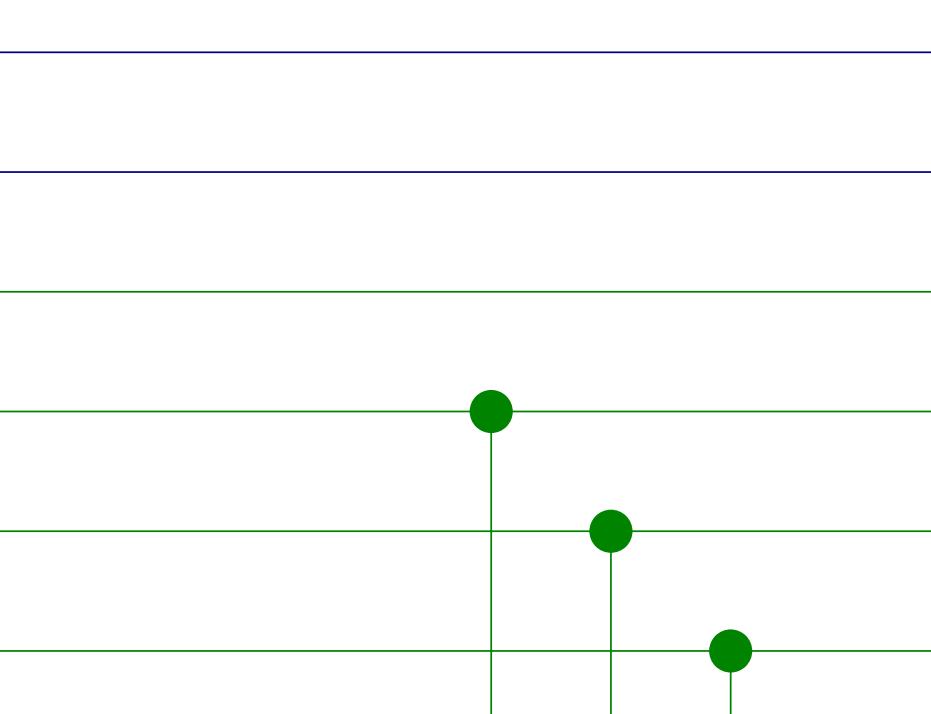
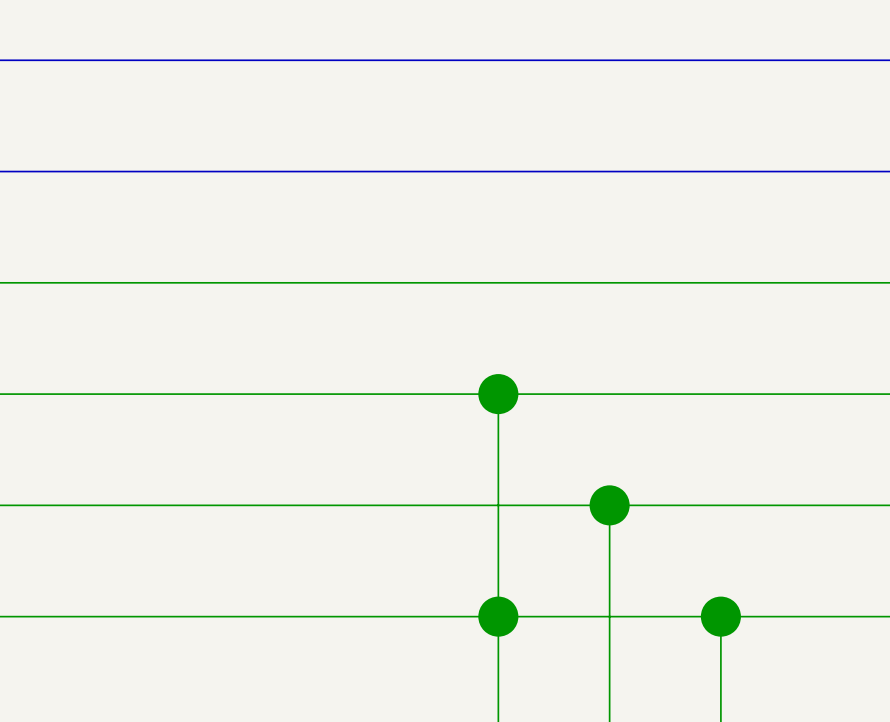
junction: none -> (498, 616)

